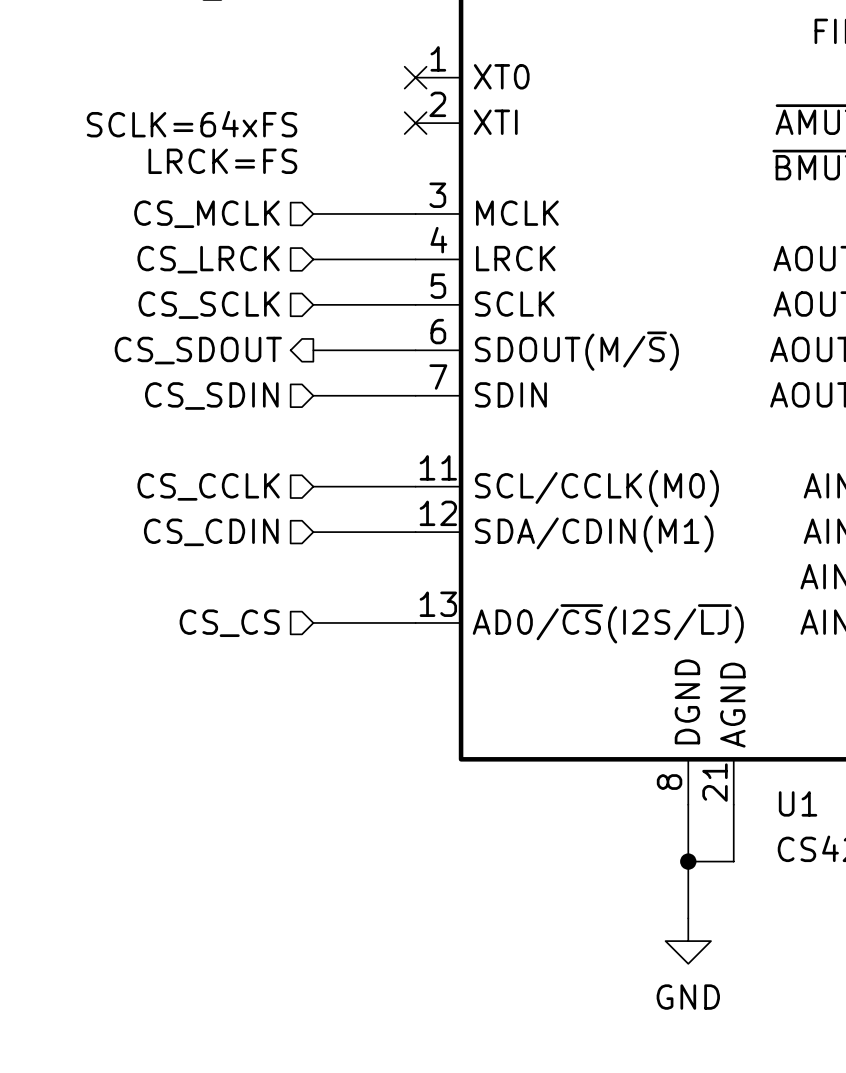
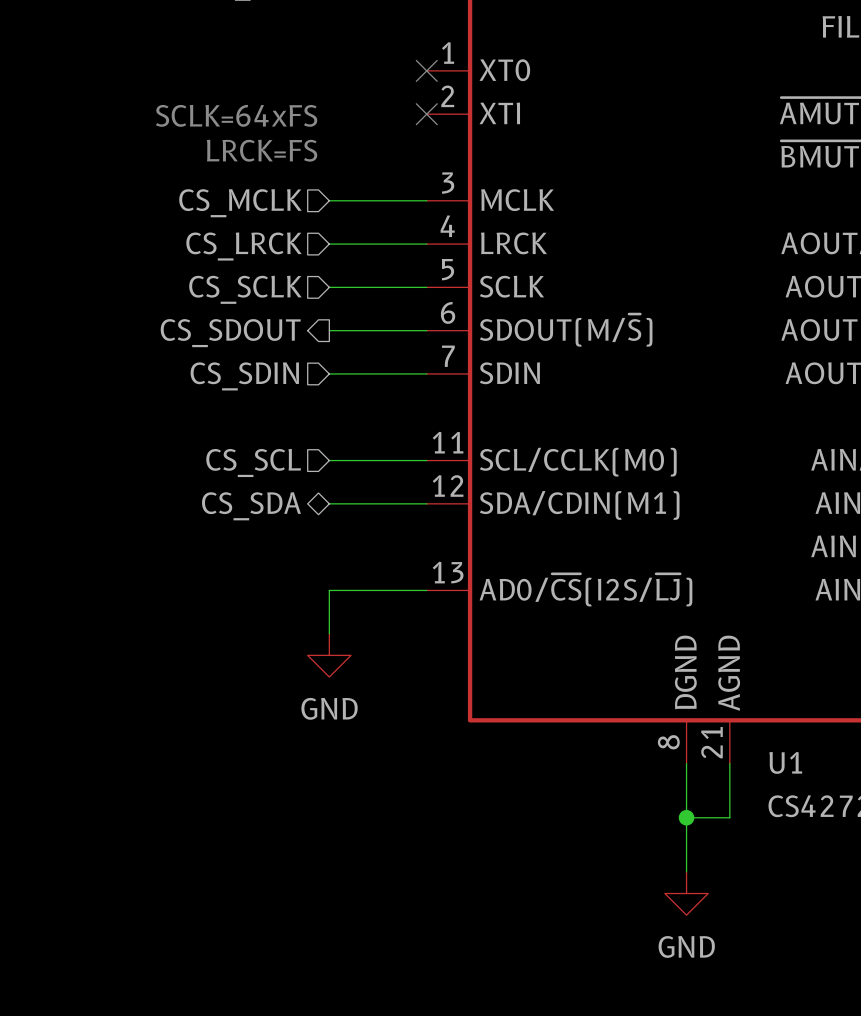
hierarchical label: CS_CCLK (208, 486) -> CS_SCL (253, 462)
hierarchical label shape: input (211, 532) -> bidirectional (251, 506)
hierarchical label: CS_CDIN (211, 532) -> CS_SDA (251, 506)
wire: none -> (329, 590) (329, 633)
hierarchical label: CS_CS (229, 623) -> none
power symbol: none -> GND (329, 655)

